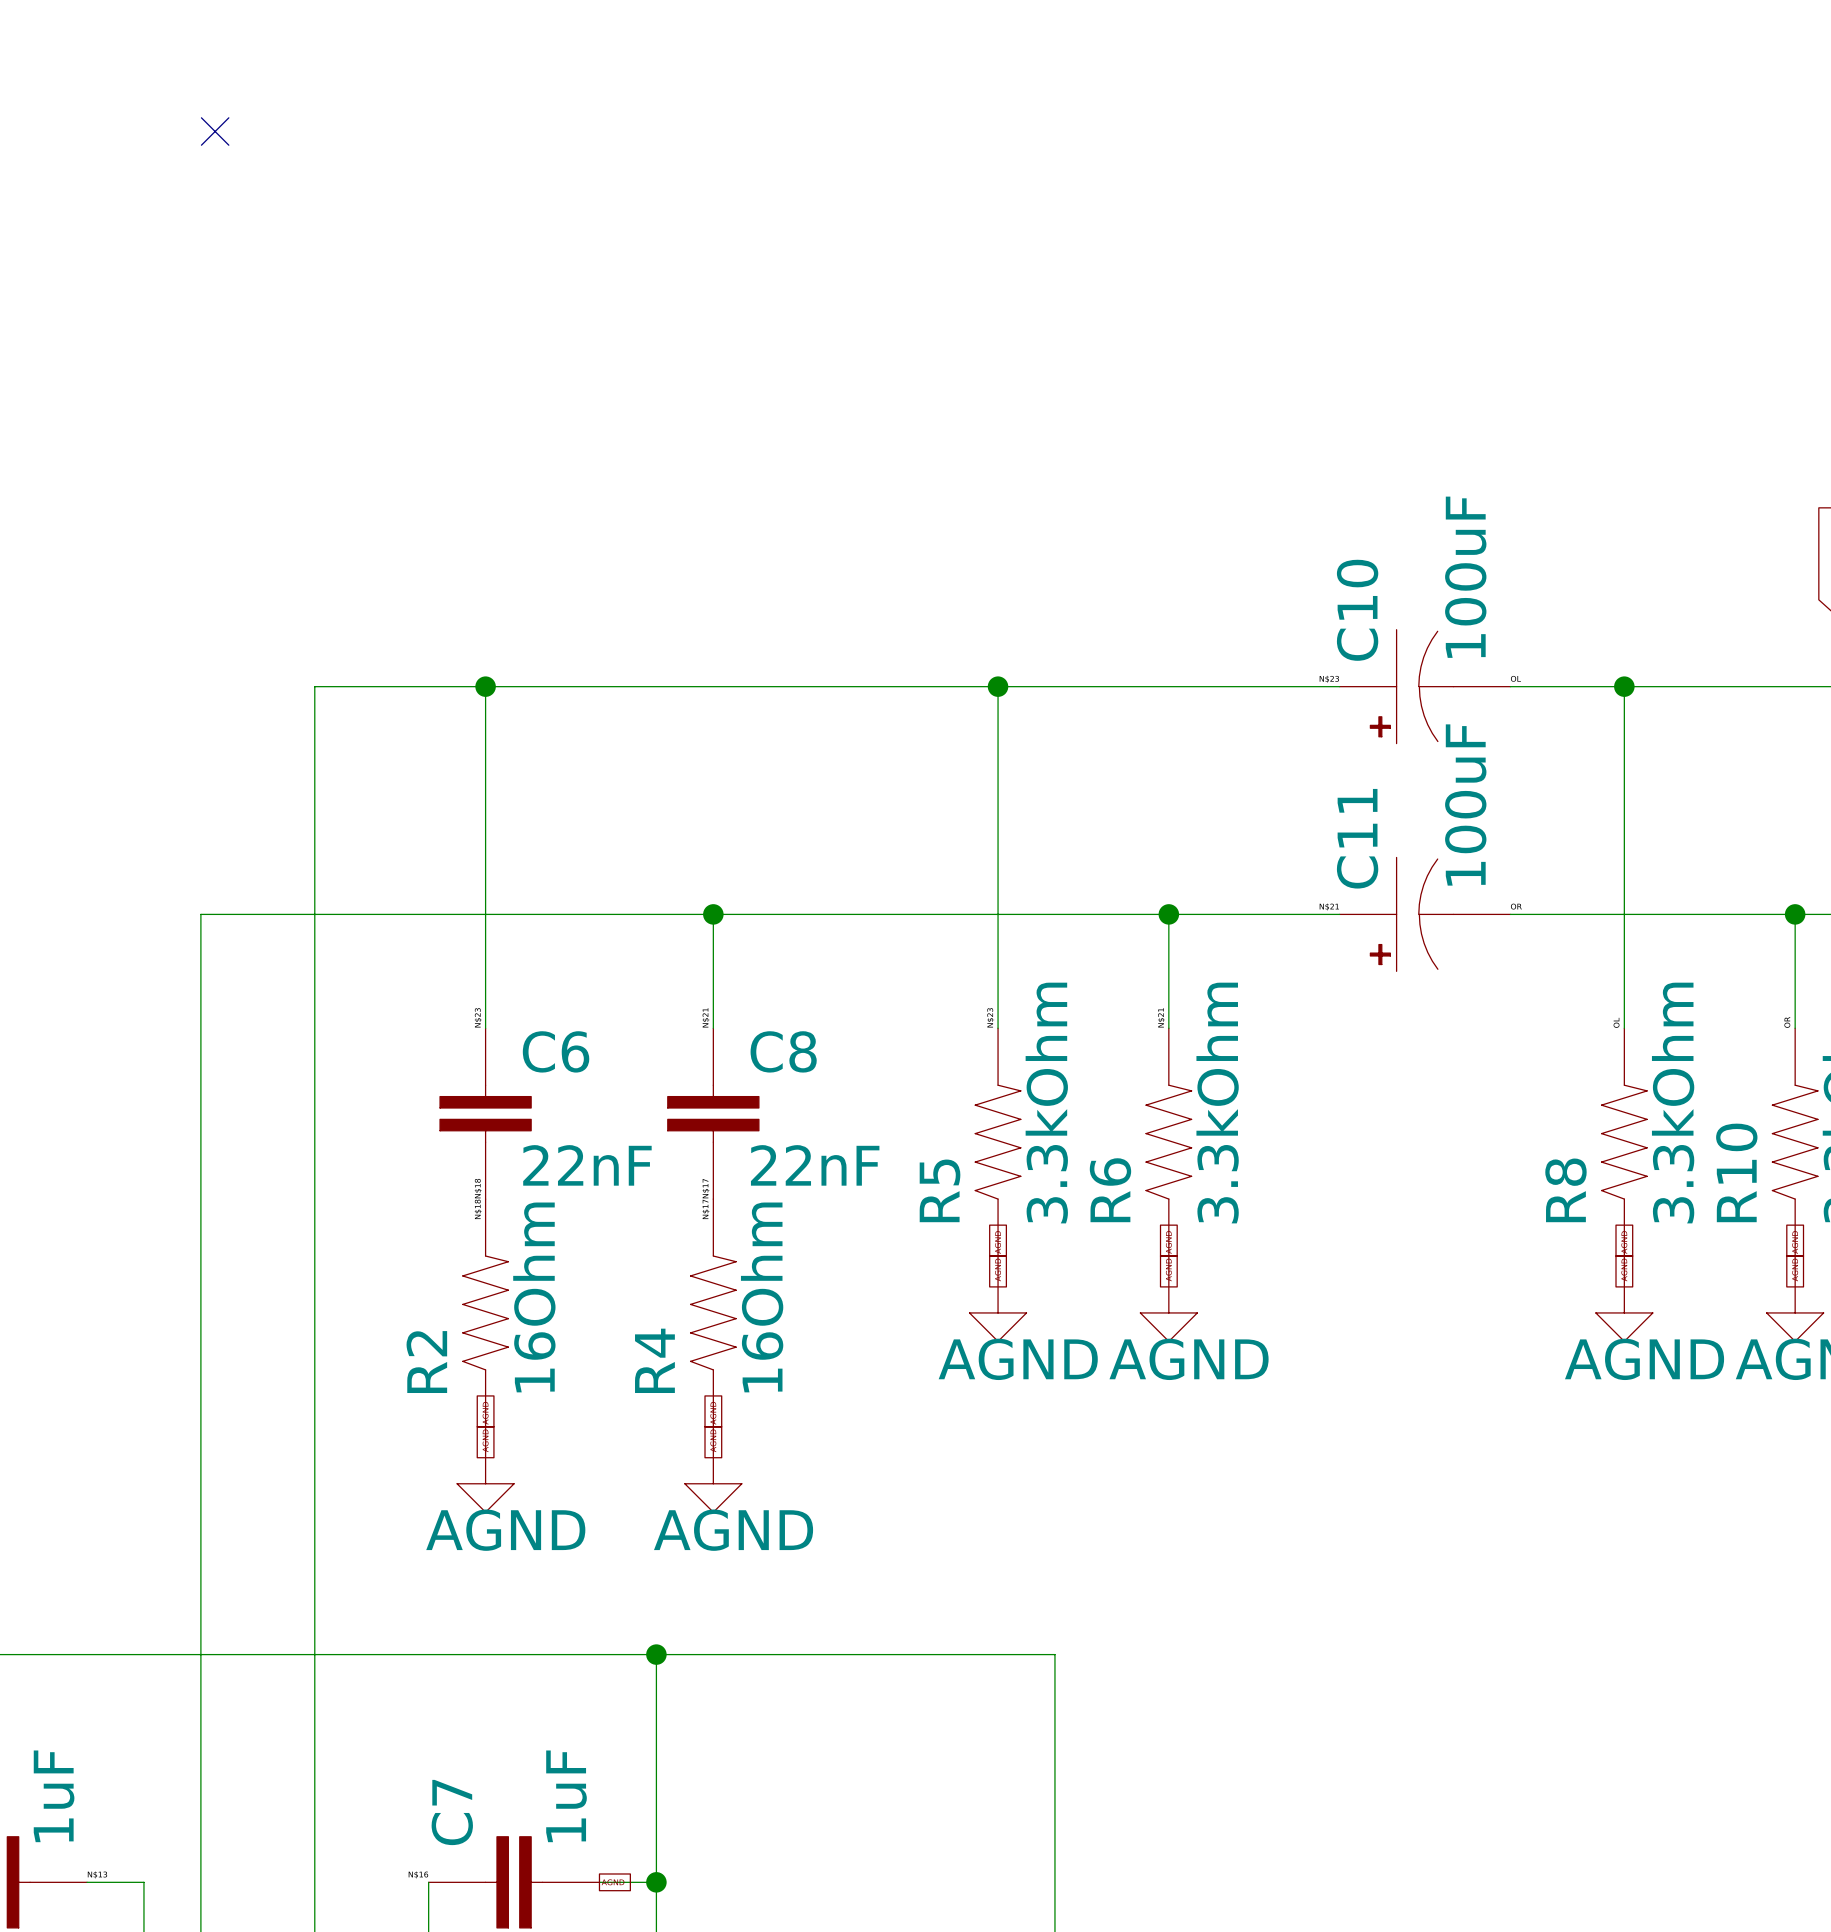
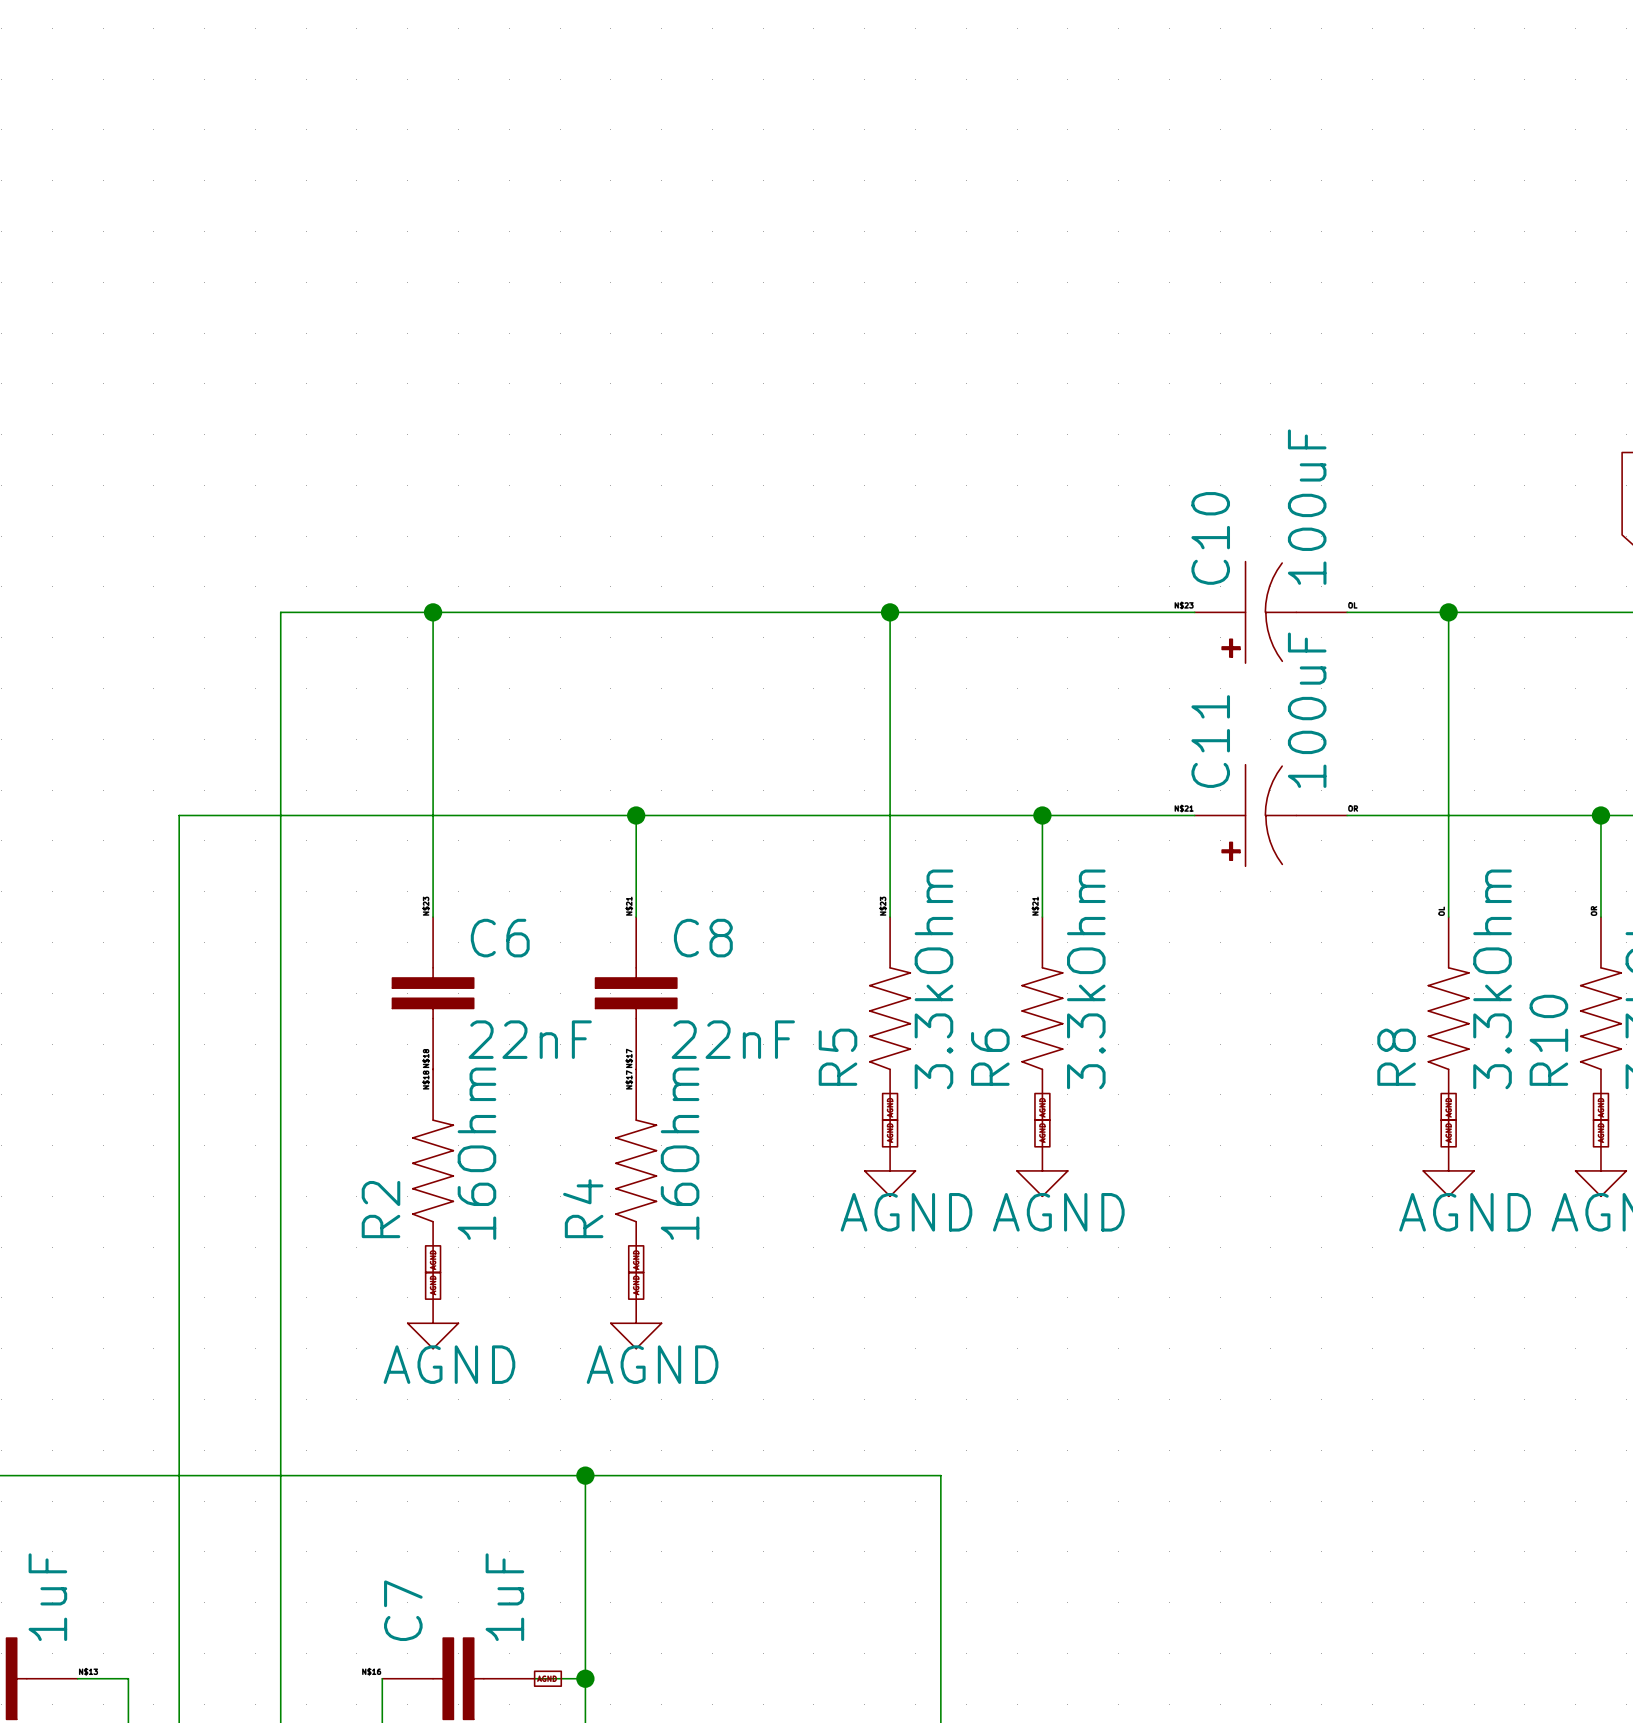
no-connect mark: (215, 131) -> none

